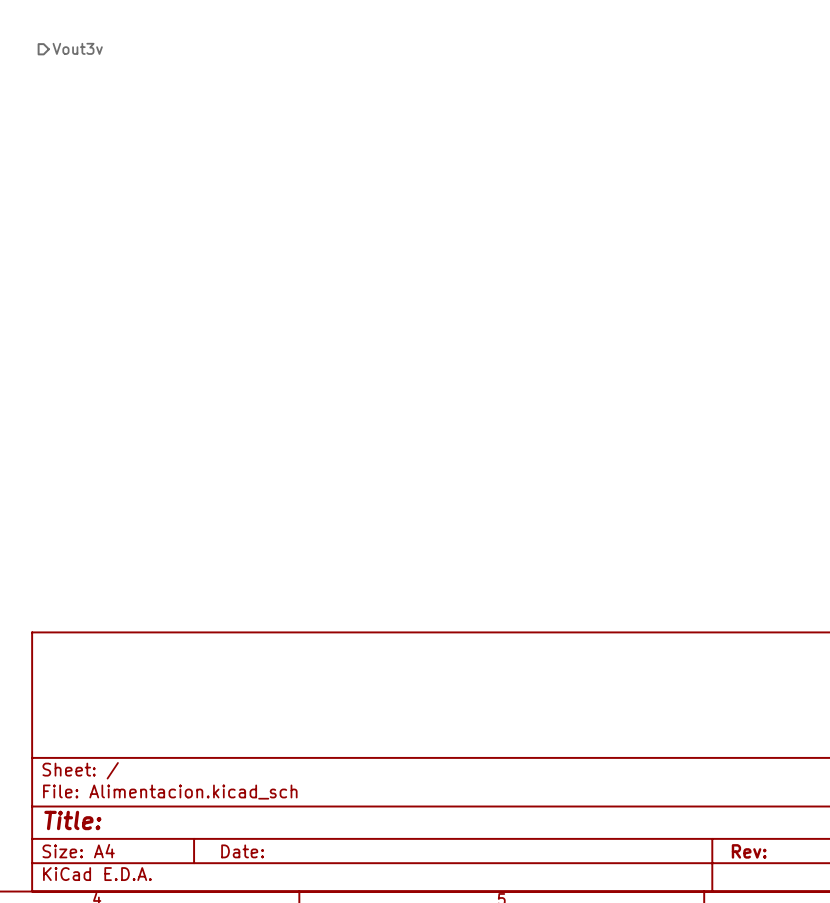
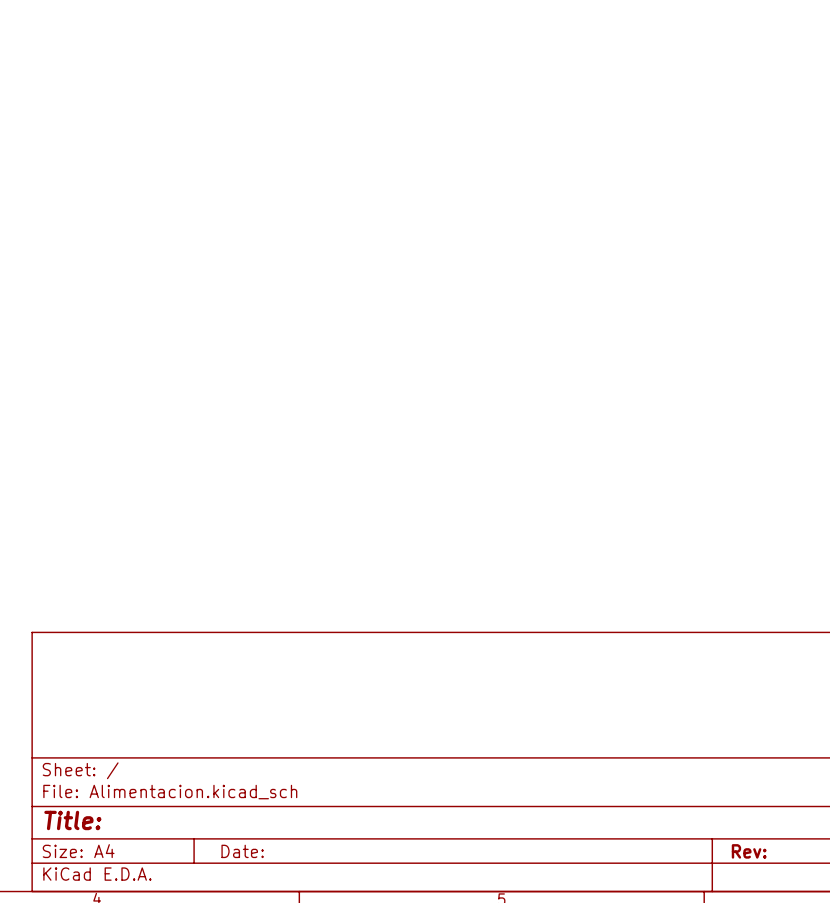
hierarchical label: Vout3v (77, 48) -> none

